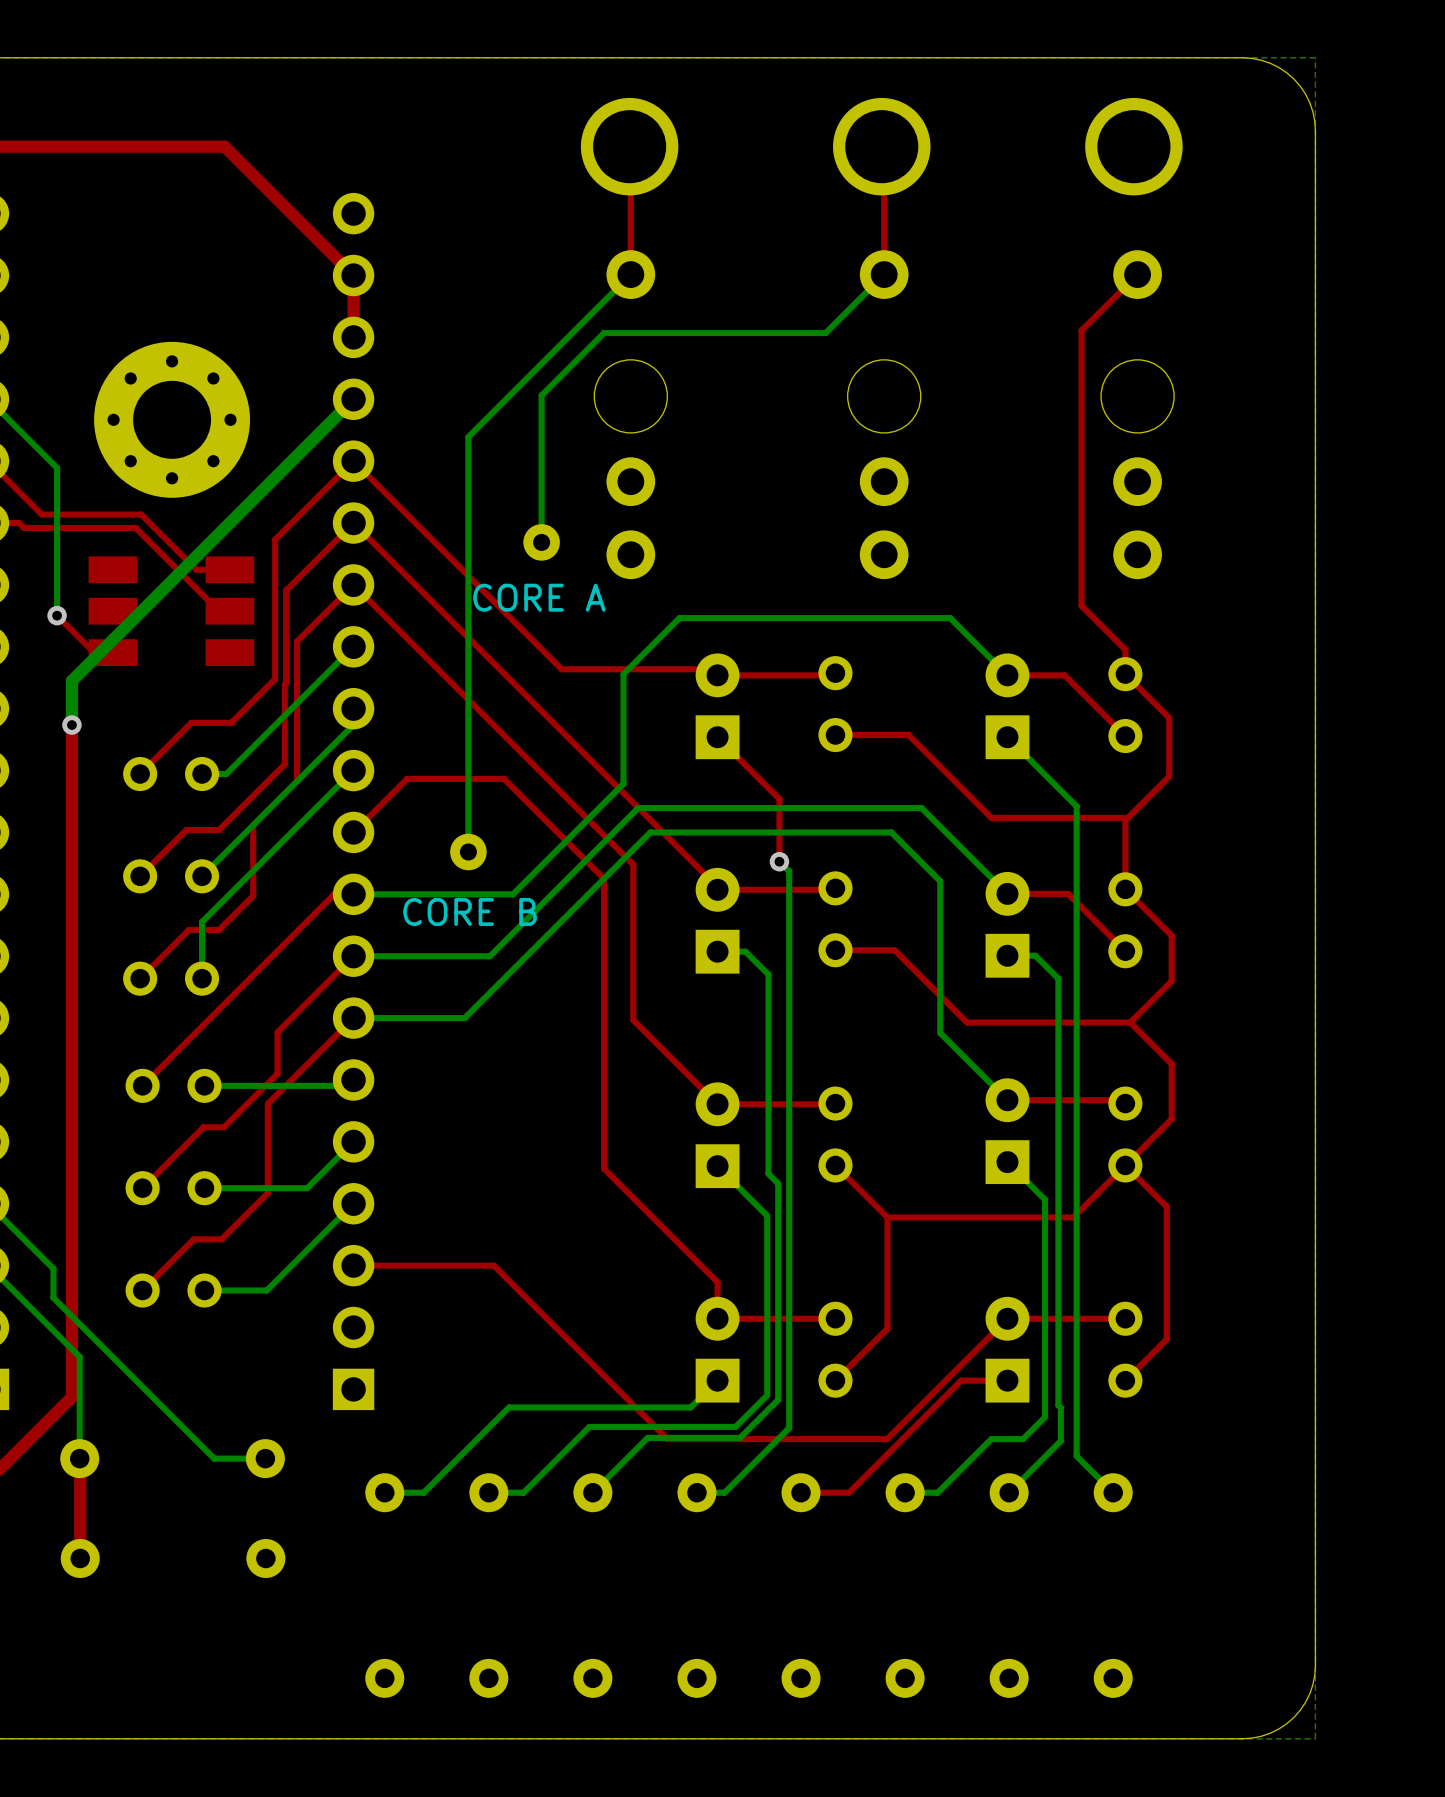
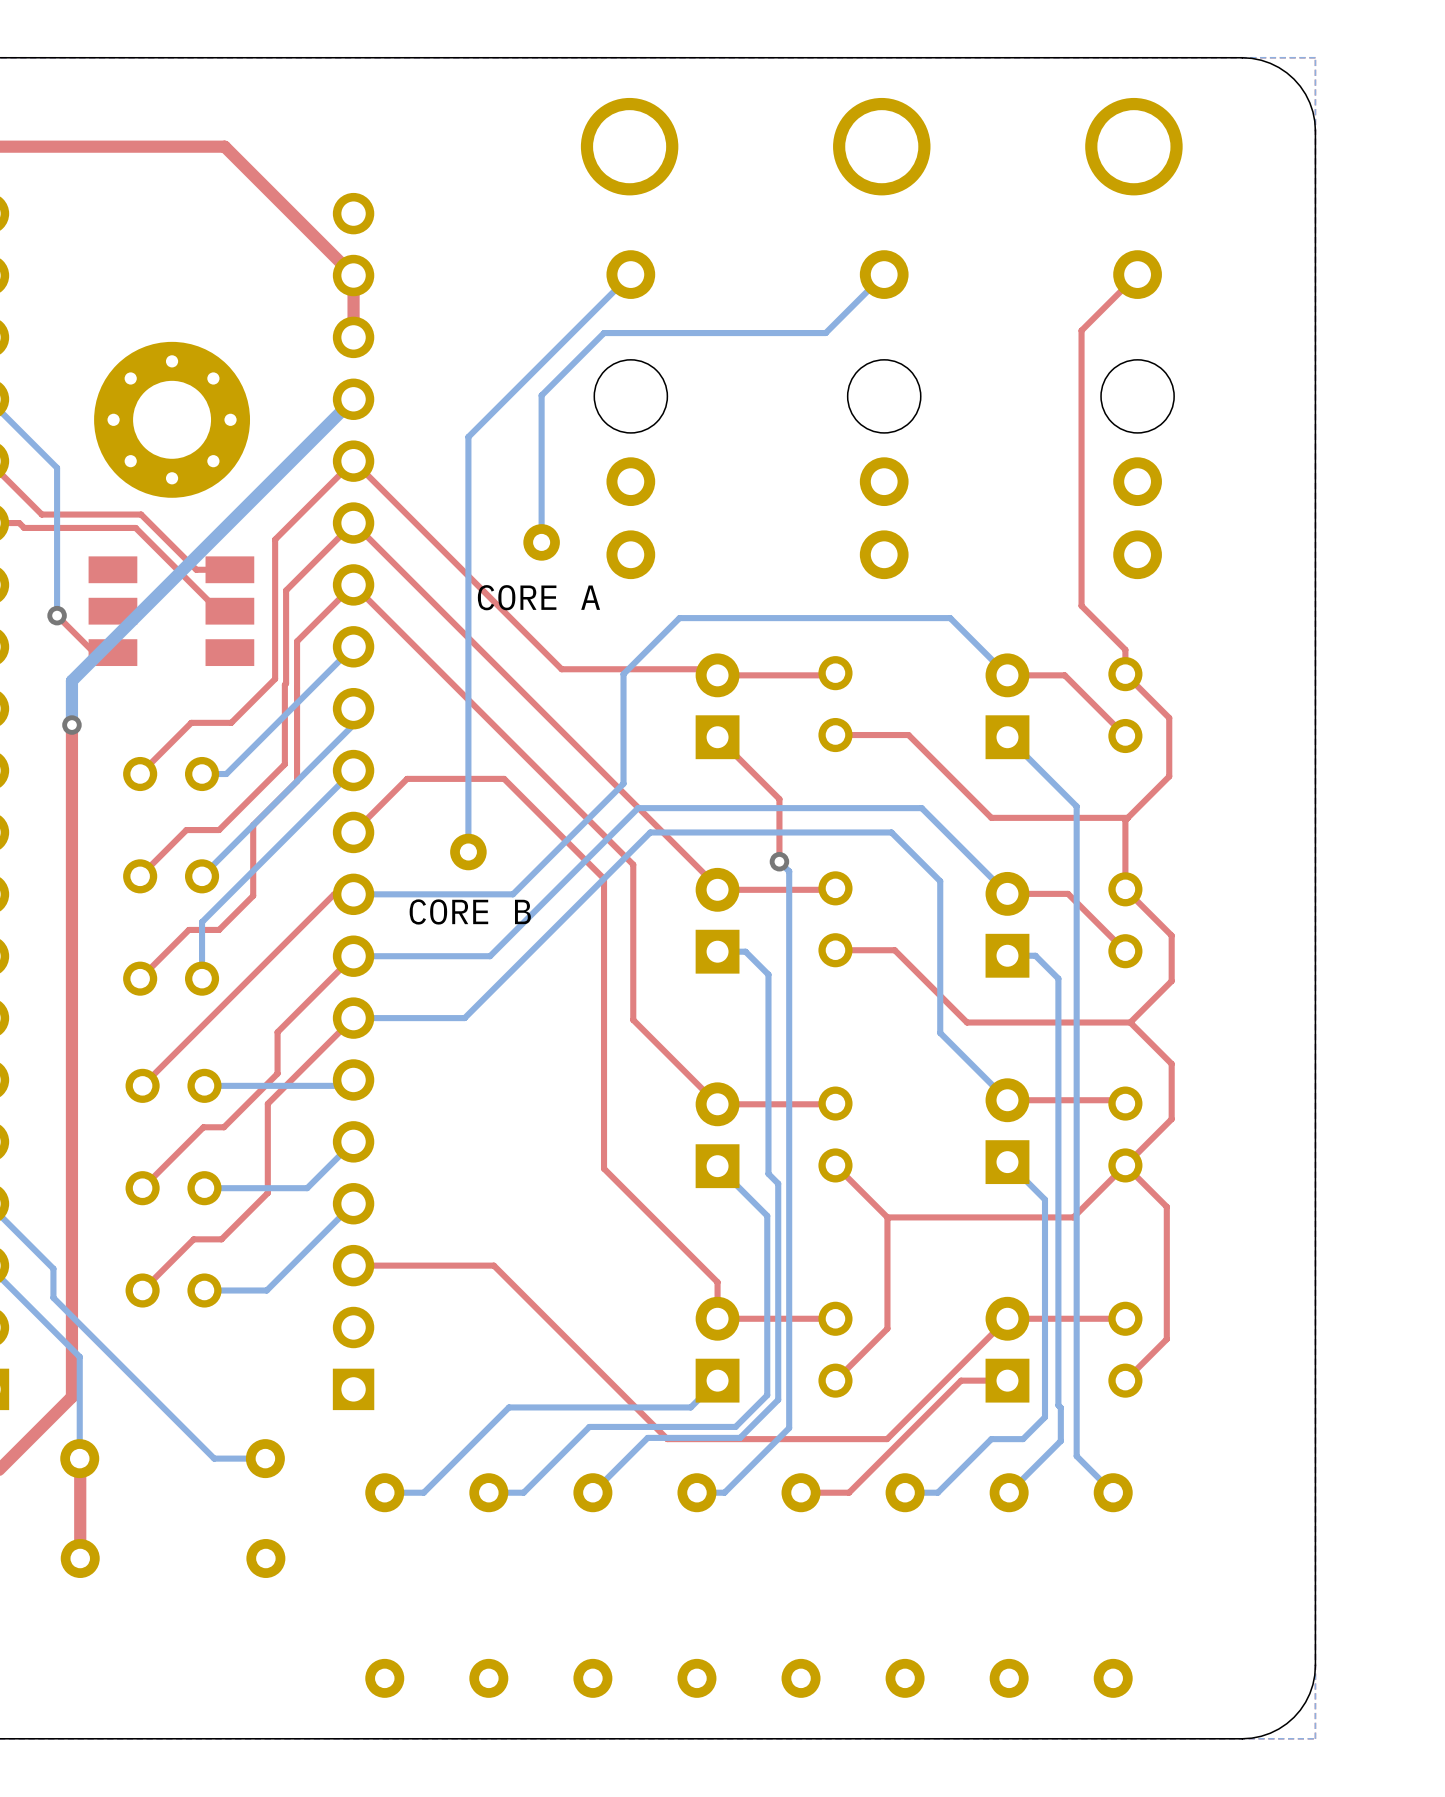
top track: (629, 146) (630, 274) -> none
top track: (881, 146) (884, 149) (884, 274) -> none

